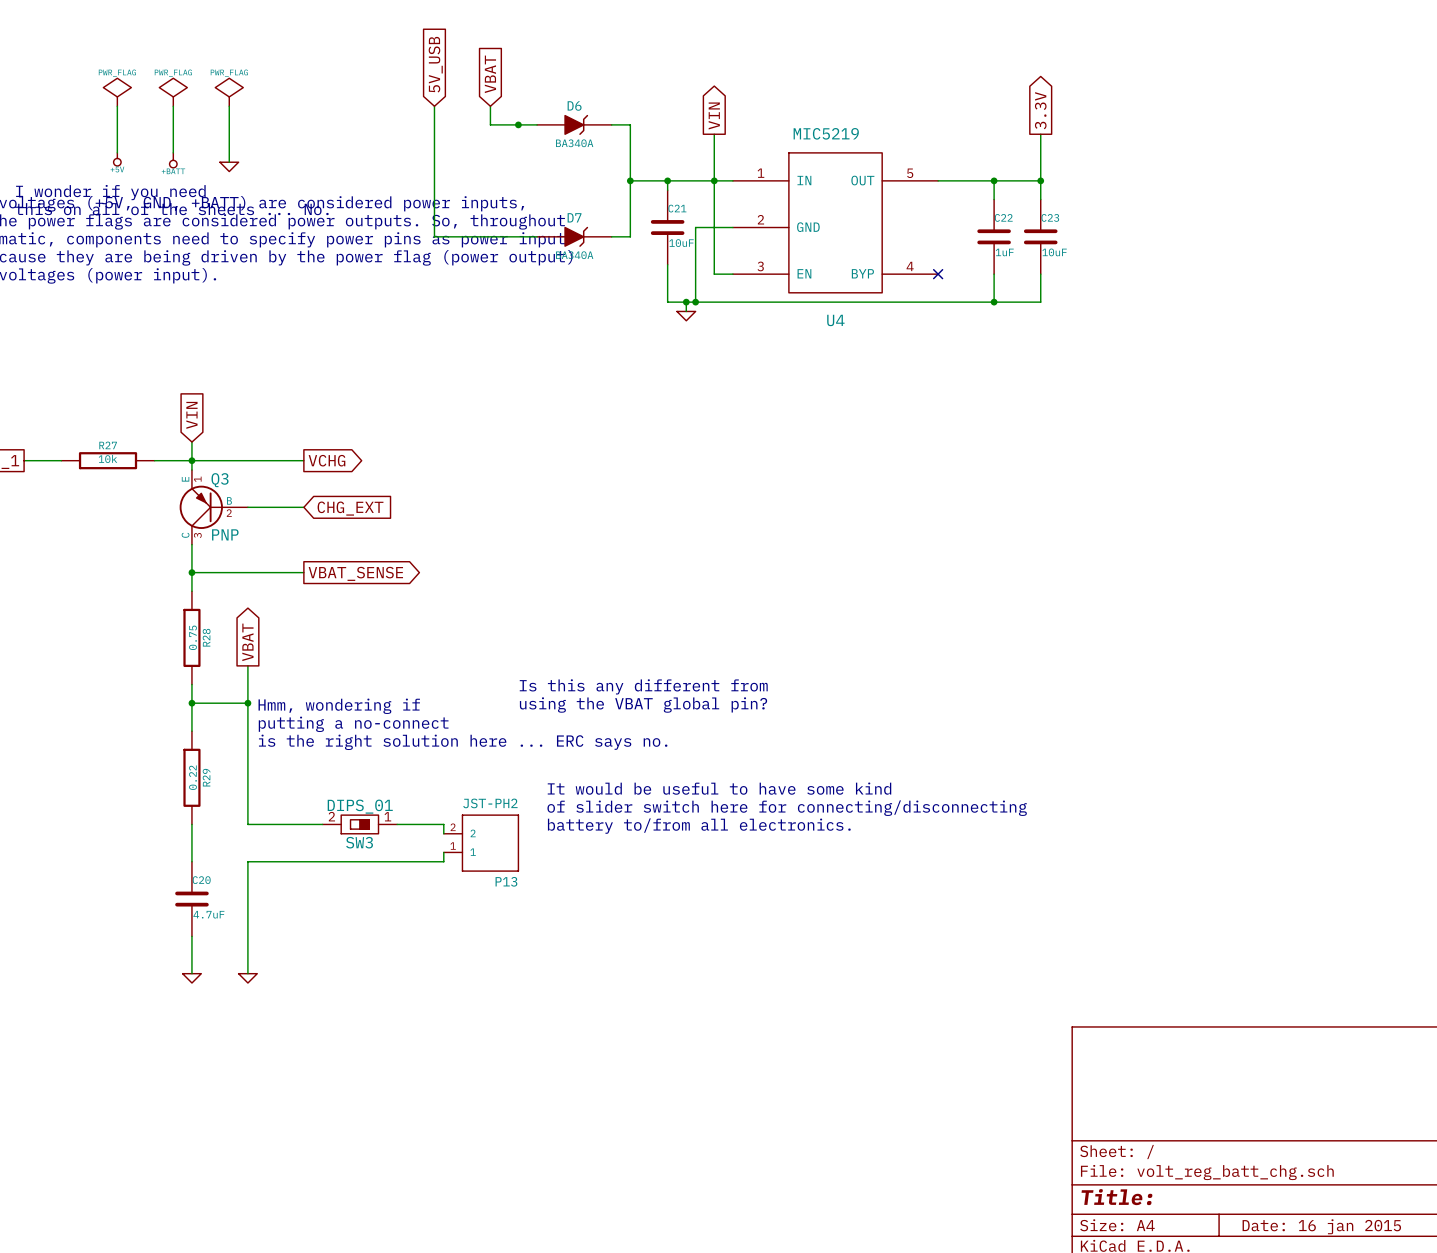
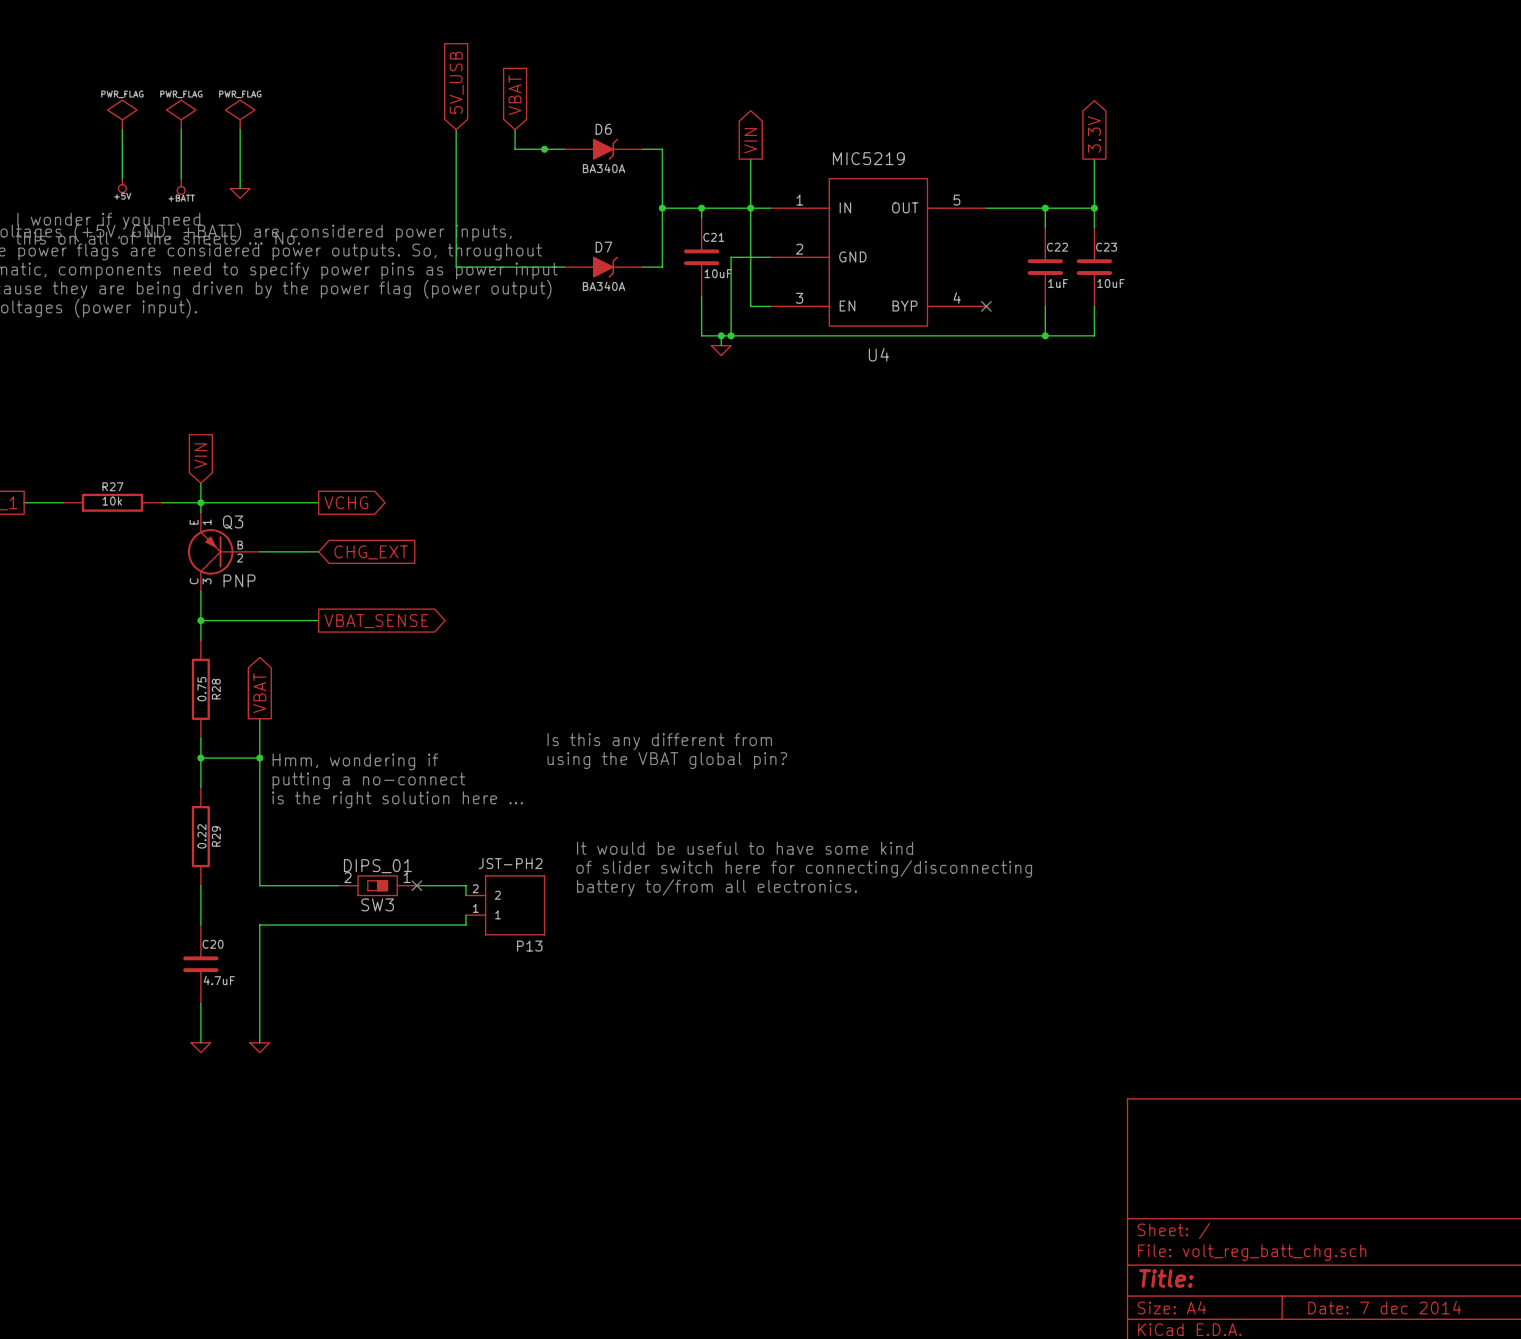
text: is the right solution here ... ERC says no. (463, 742) -> is the right solution here ... (397, 799)
no-connect mark: none -> (416, 885)
title block: Date: 16 jan 2015 (1321, 1226) -> Date: 7 dec 2014 (1384, 1307)

